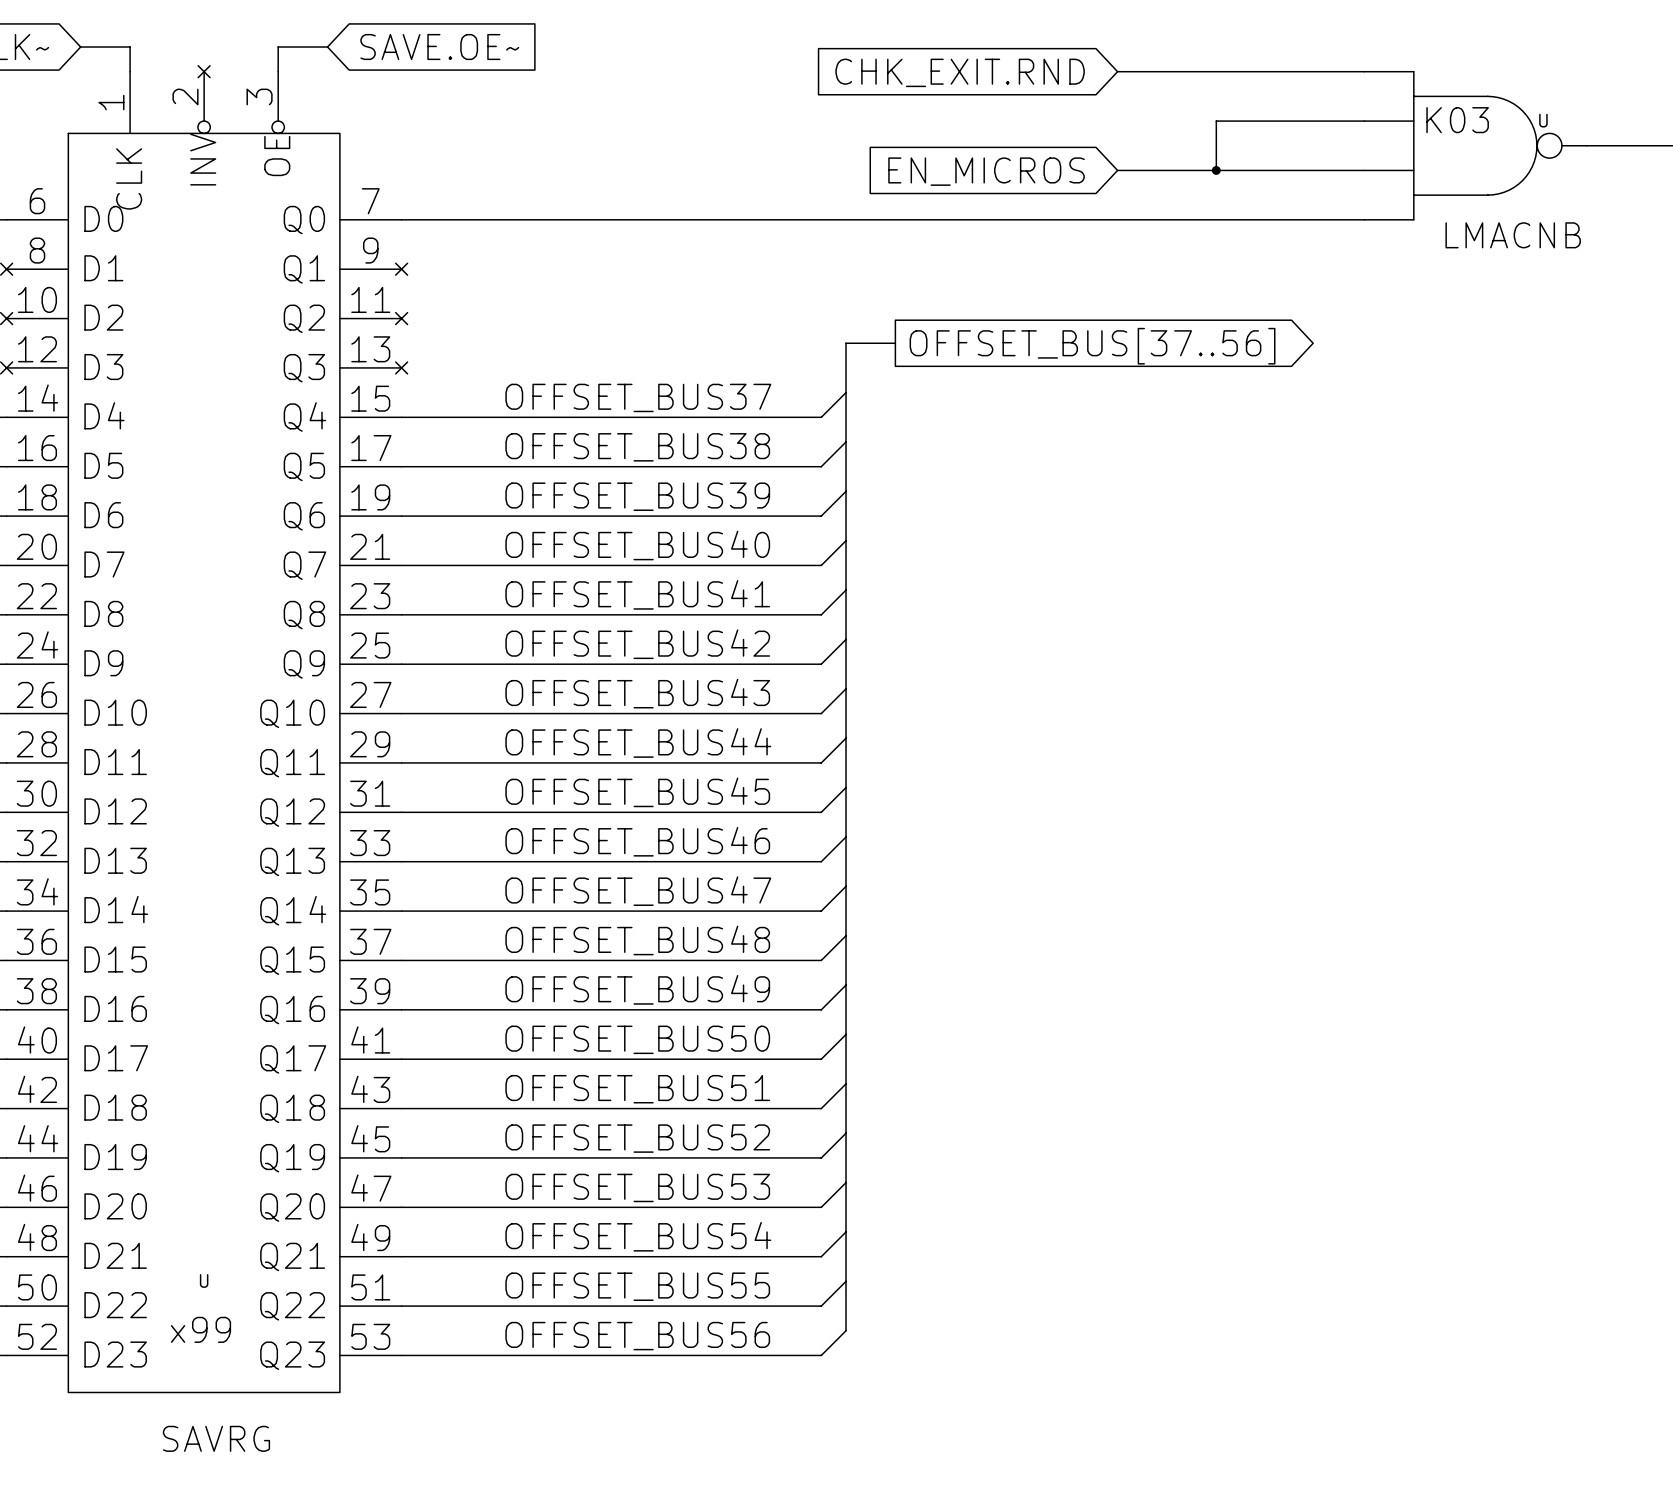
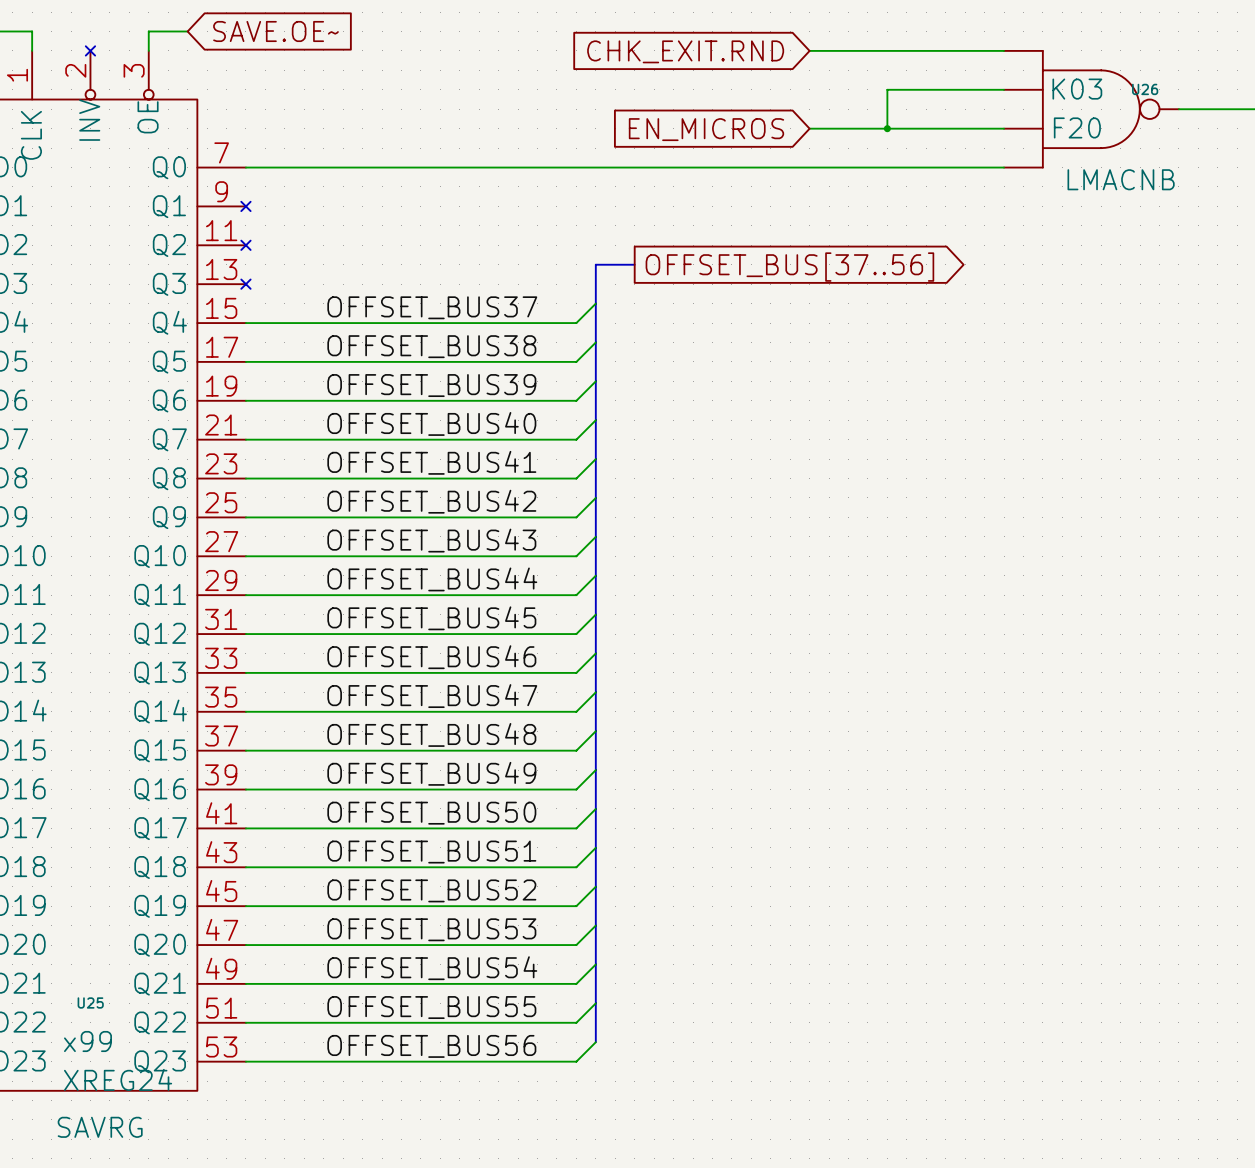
U name: U (1543, 120) -> U26 (1145, 89)
U value: none -> F20 (1077, 127)
U name: U (204, 1280) -> U25 (90, 1002)
U value: none -> XREG24 (118, 1079)

